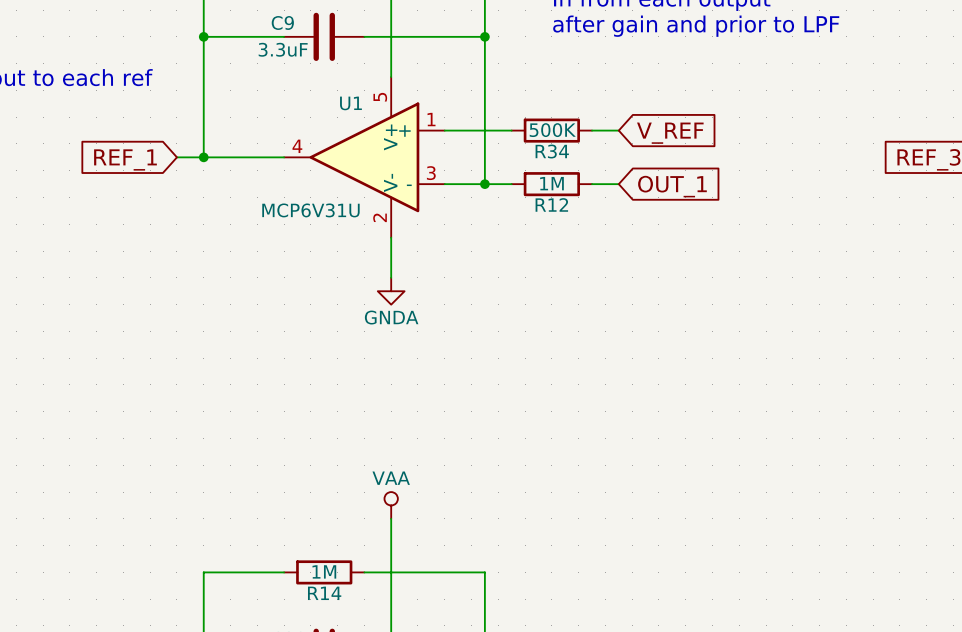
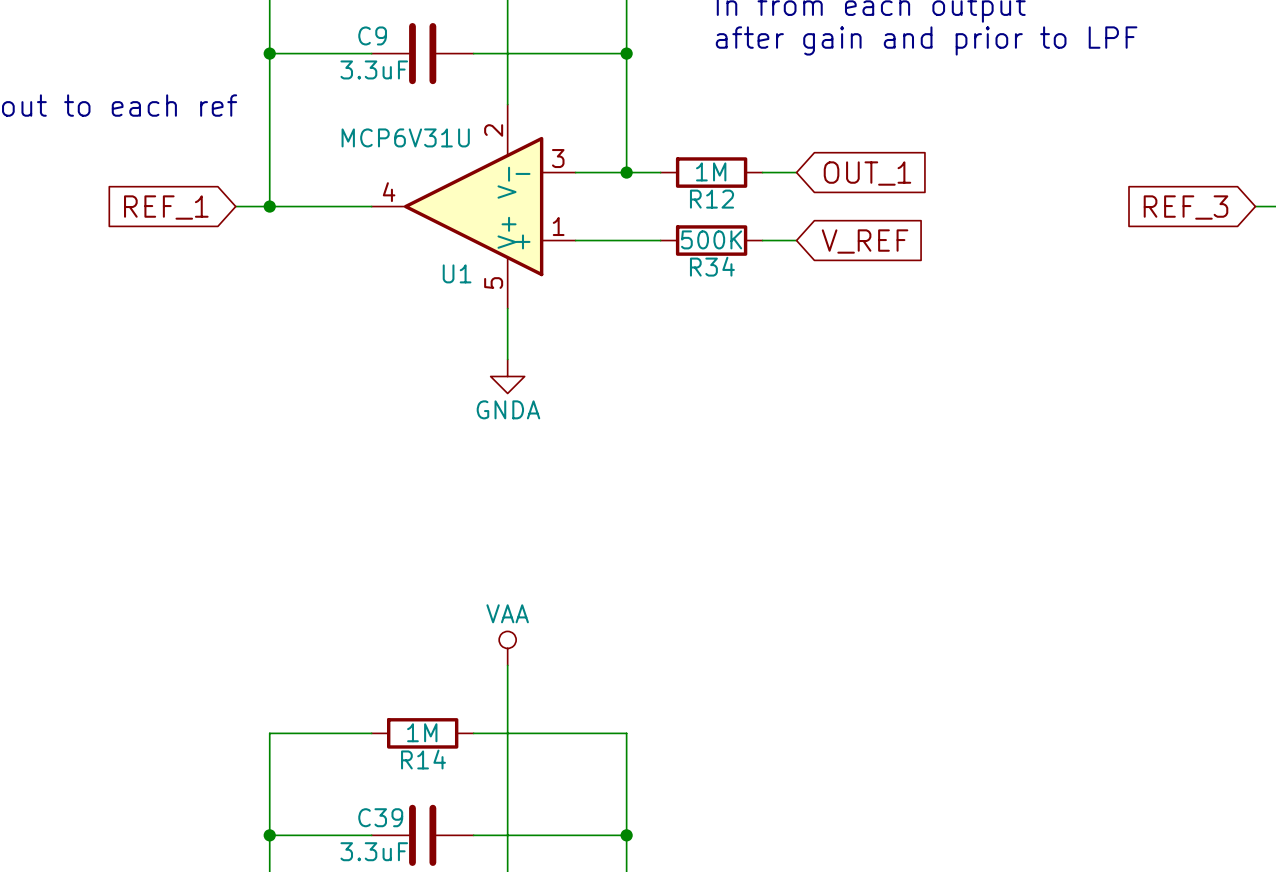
wire: (484, 130) (484, 184) -> none
R34 value: 500K (552, 130) -> 1M (711, 171)
global label: V_REF (670, 133) -> OUT_1 (867, 173)
R34 name: R34 (552, 151) -> R12 (712, 199)
U1 flip: as is (364, 157) -> up-down (473, 206)
R12 value: 1M (551, 183) -> 500K (711, 239)
junction position: (484, 184) -> (626, 172)
global label: OUT_1 (672, 186) -> V_REF (865, 241)
R12 name: R12 (551, 204) -> R34 (712, 266)

